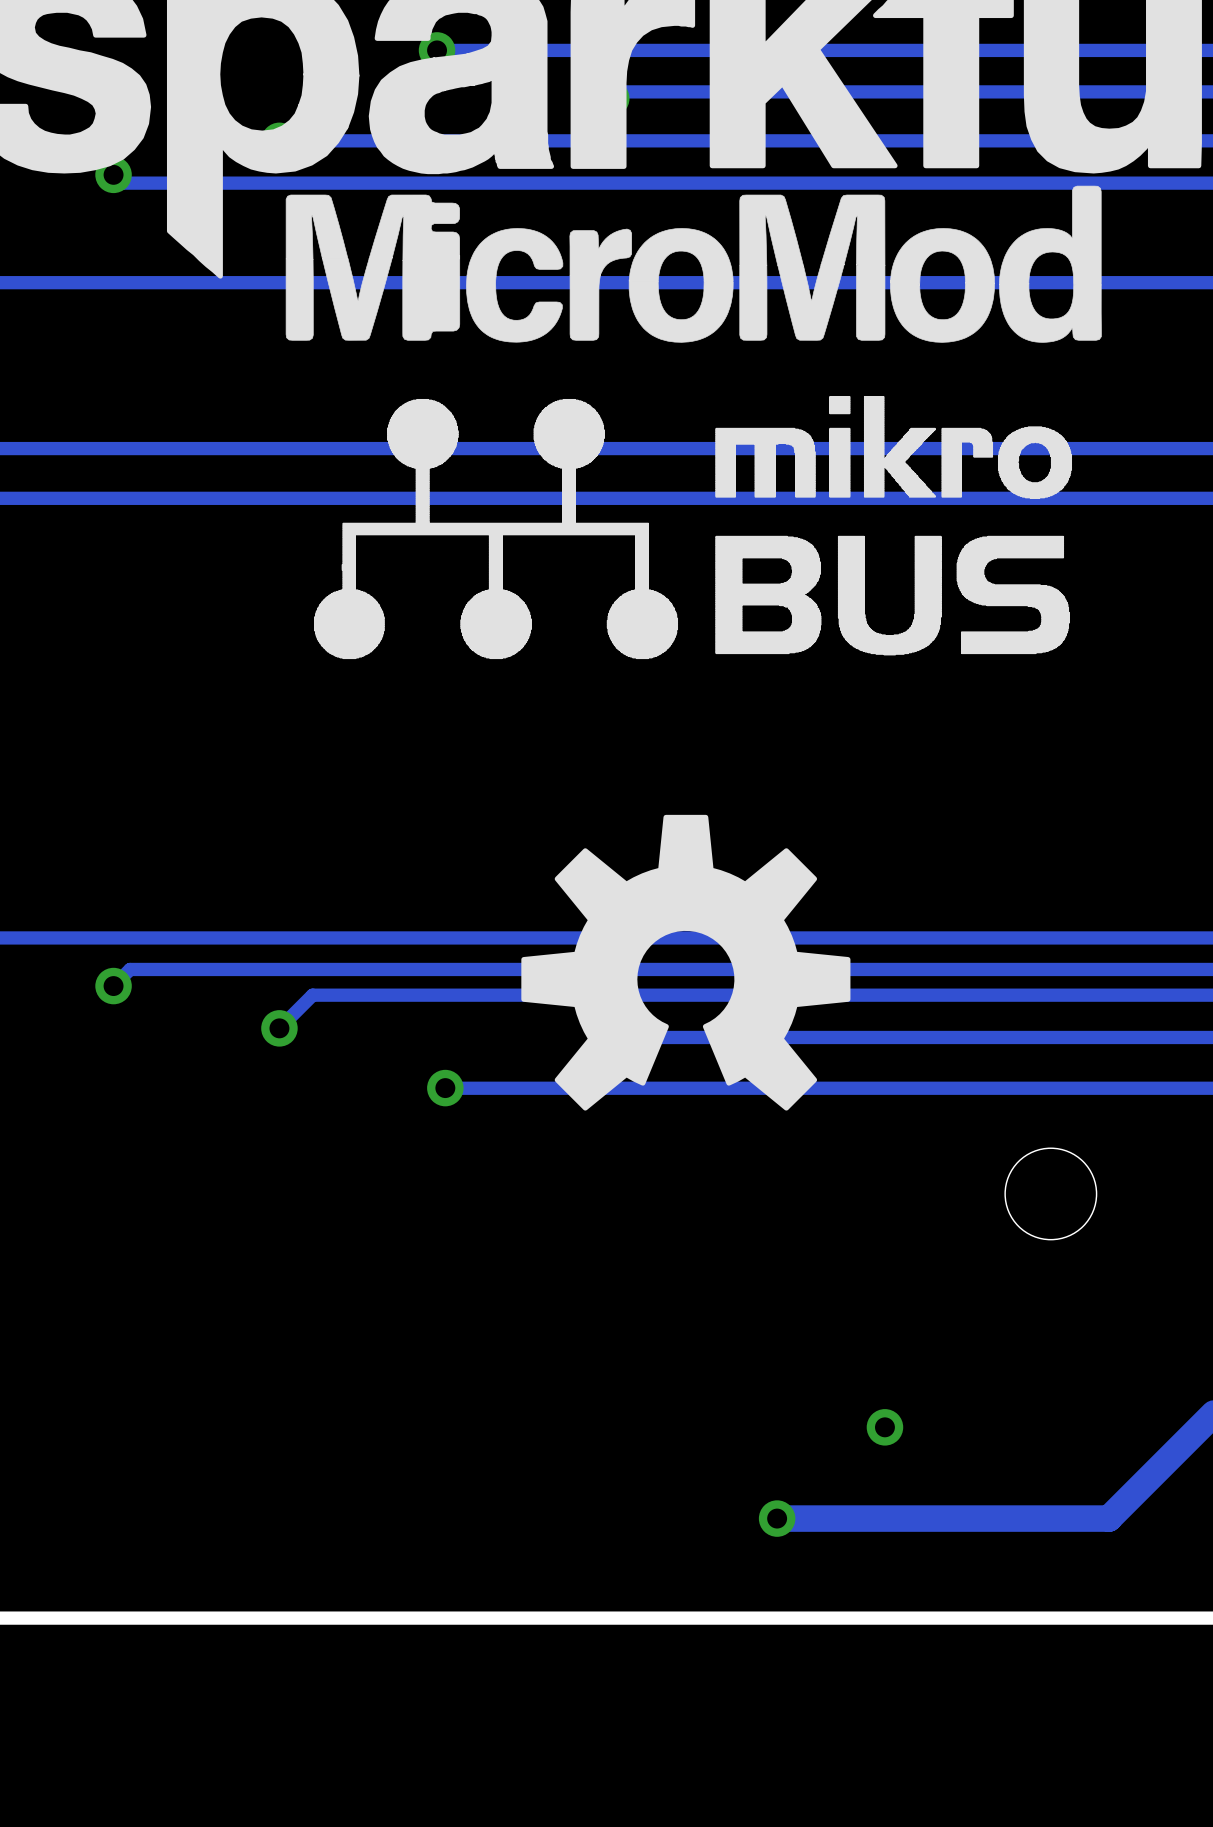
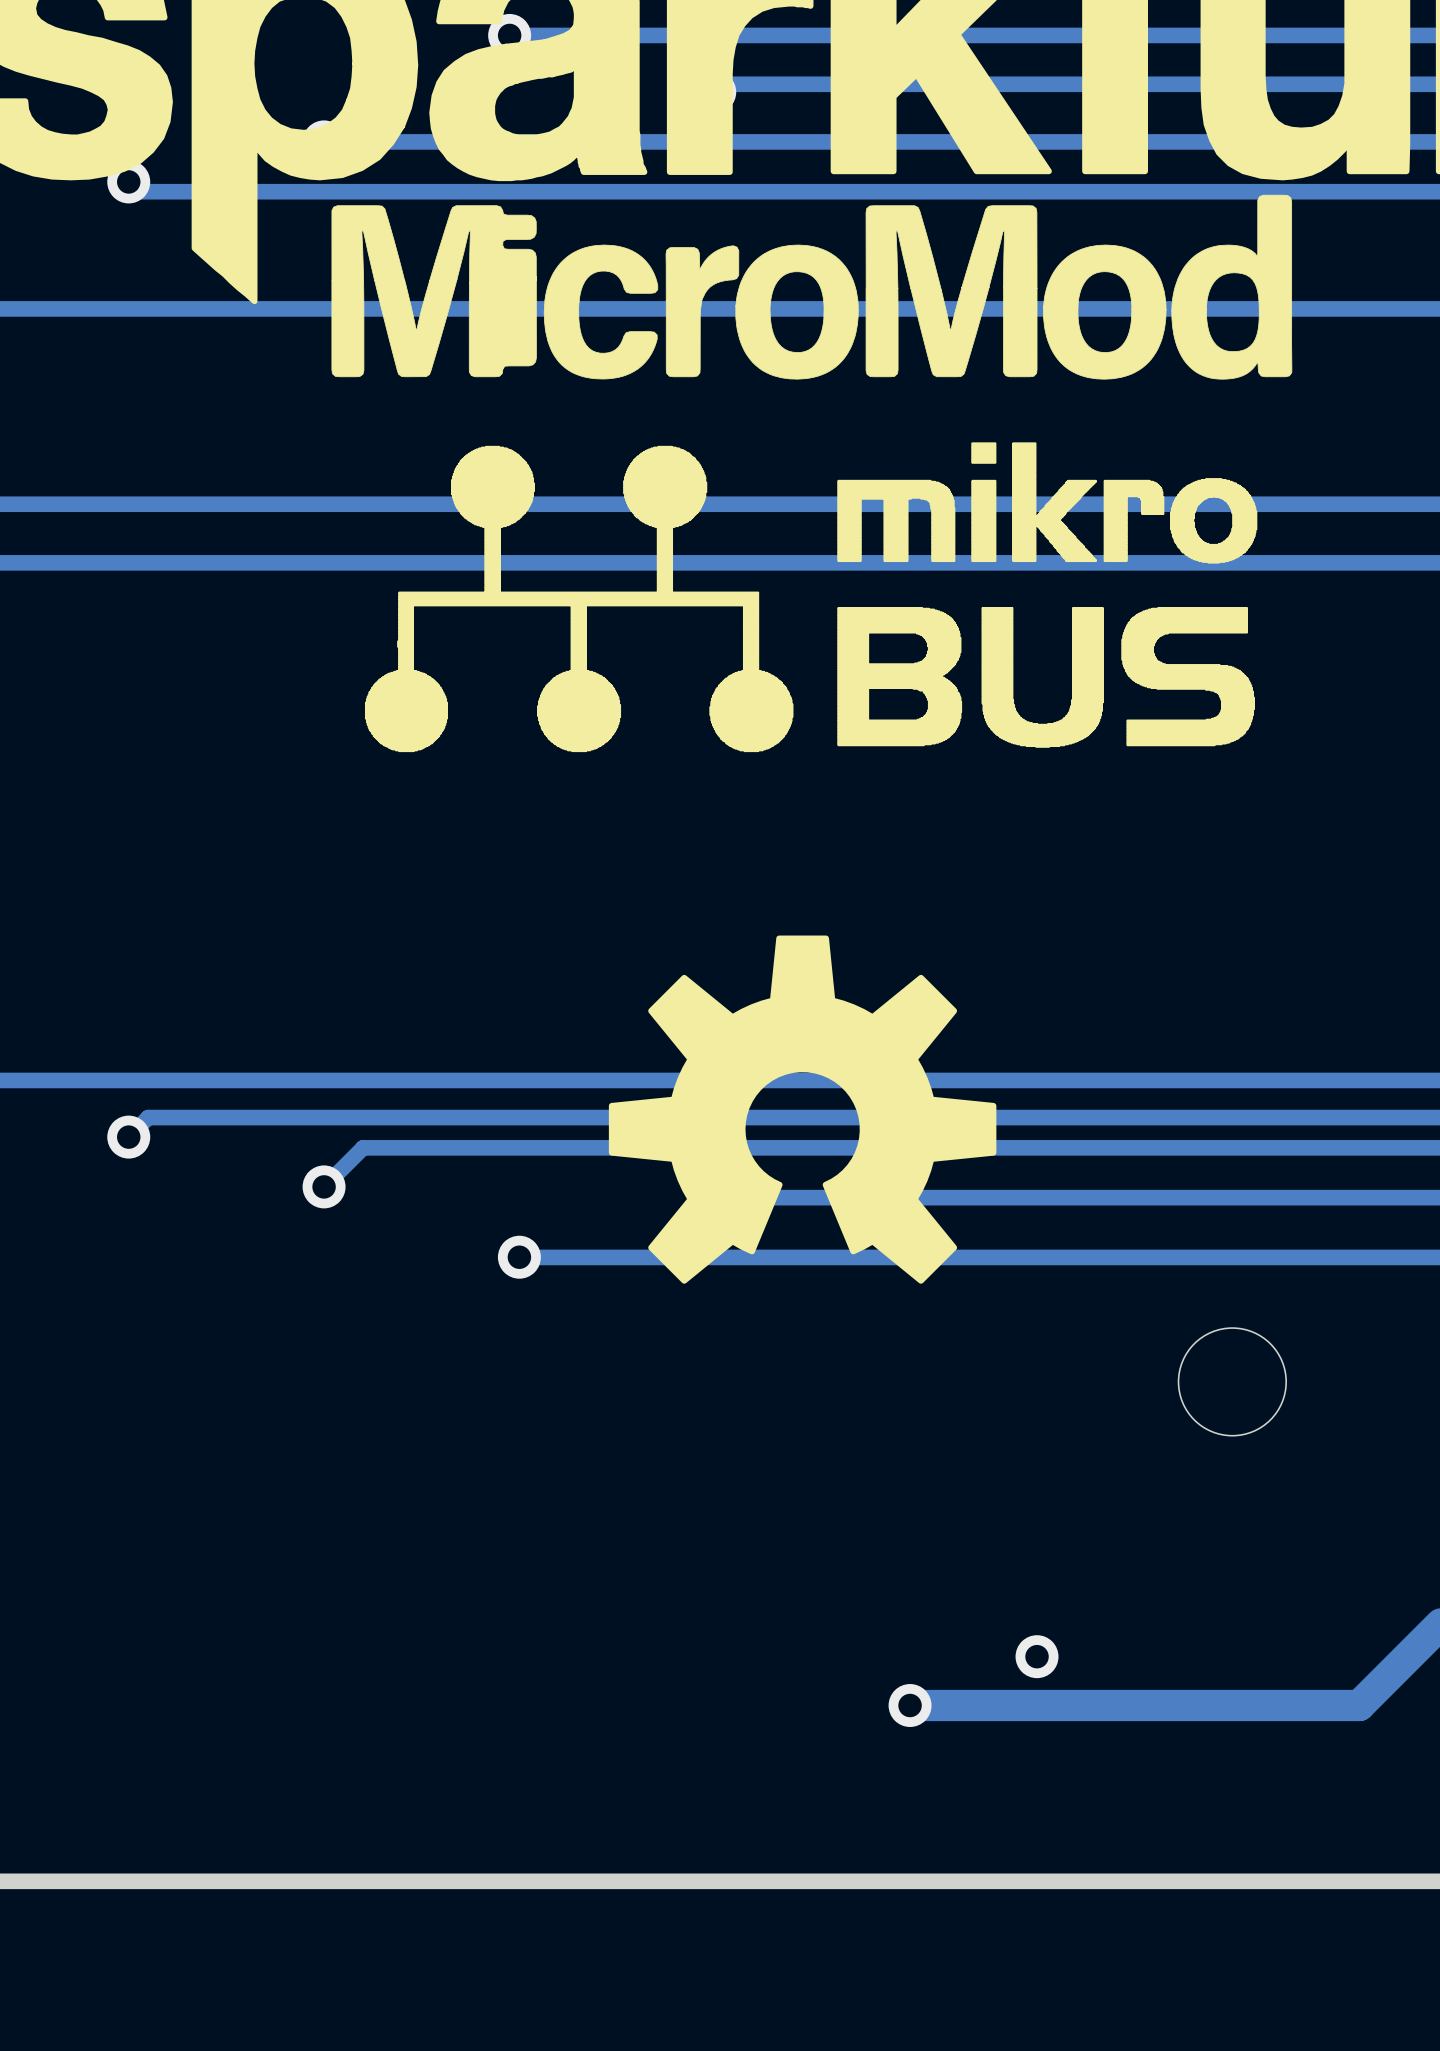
track: (1158, 1468) (1108, 1518) (777, 1518) -> (1359, 1705) (910, 1705)
via position: (777, 1518) -> (910, 1705)

